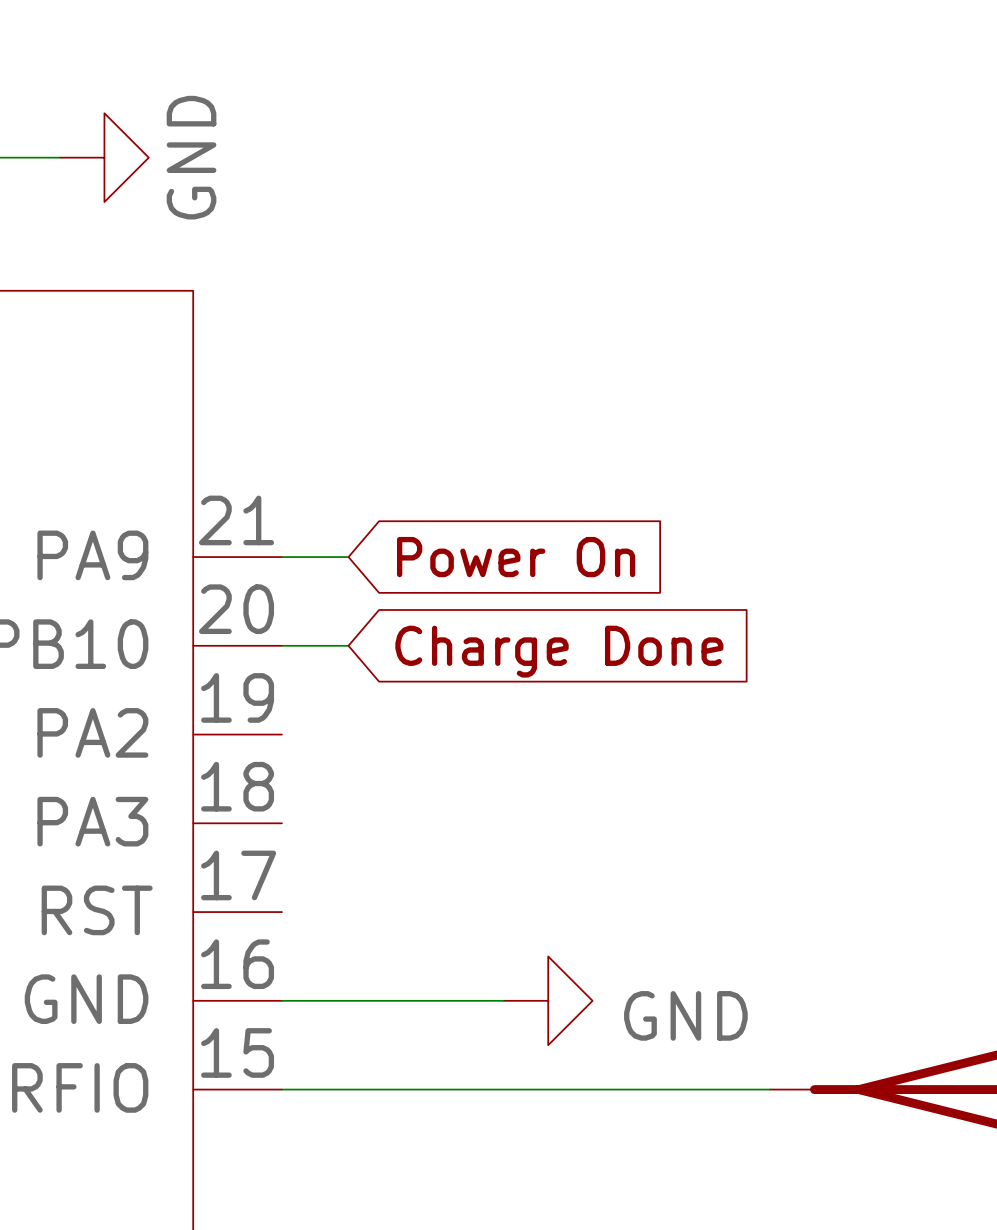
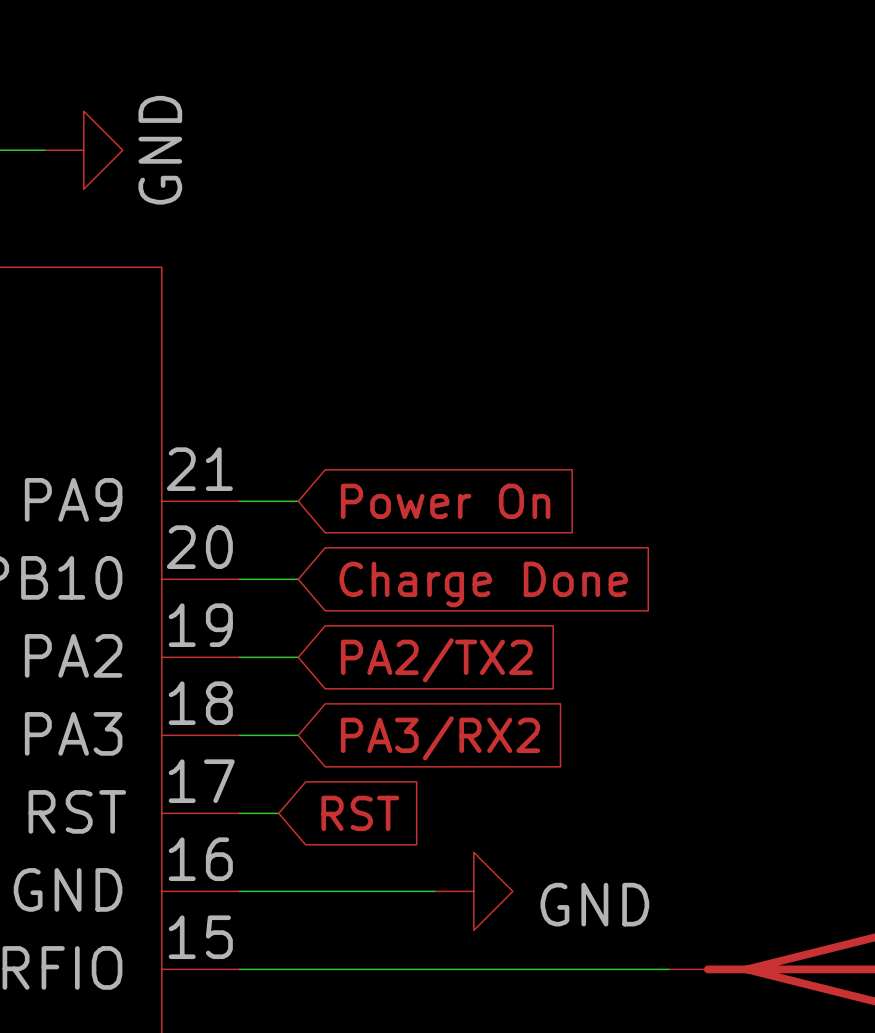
wire: none -> (239, 657) (298, 657)
global label: none -> PA2/TX2 (436, 660)
wire: none -> (239, 735) (298, 735)
global label: none -> PA3/RX2 (440, 738)
wire: none -> (239, 813) (278, 813)
global label: none -> RST (360, 813)

